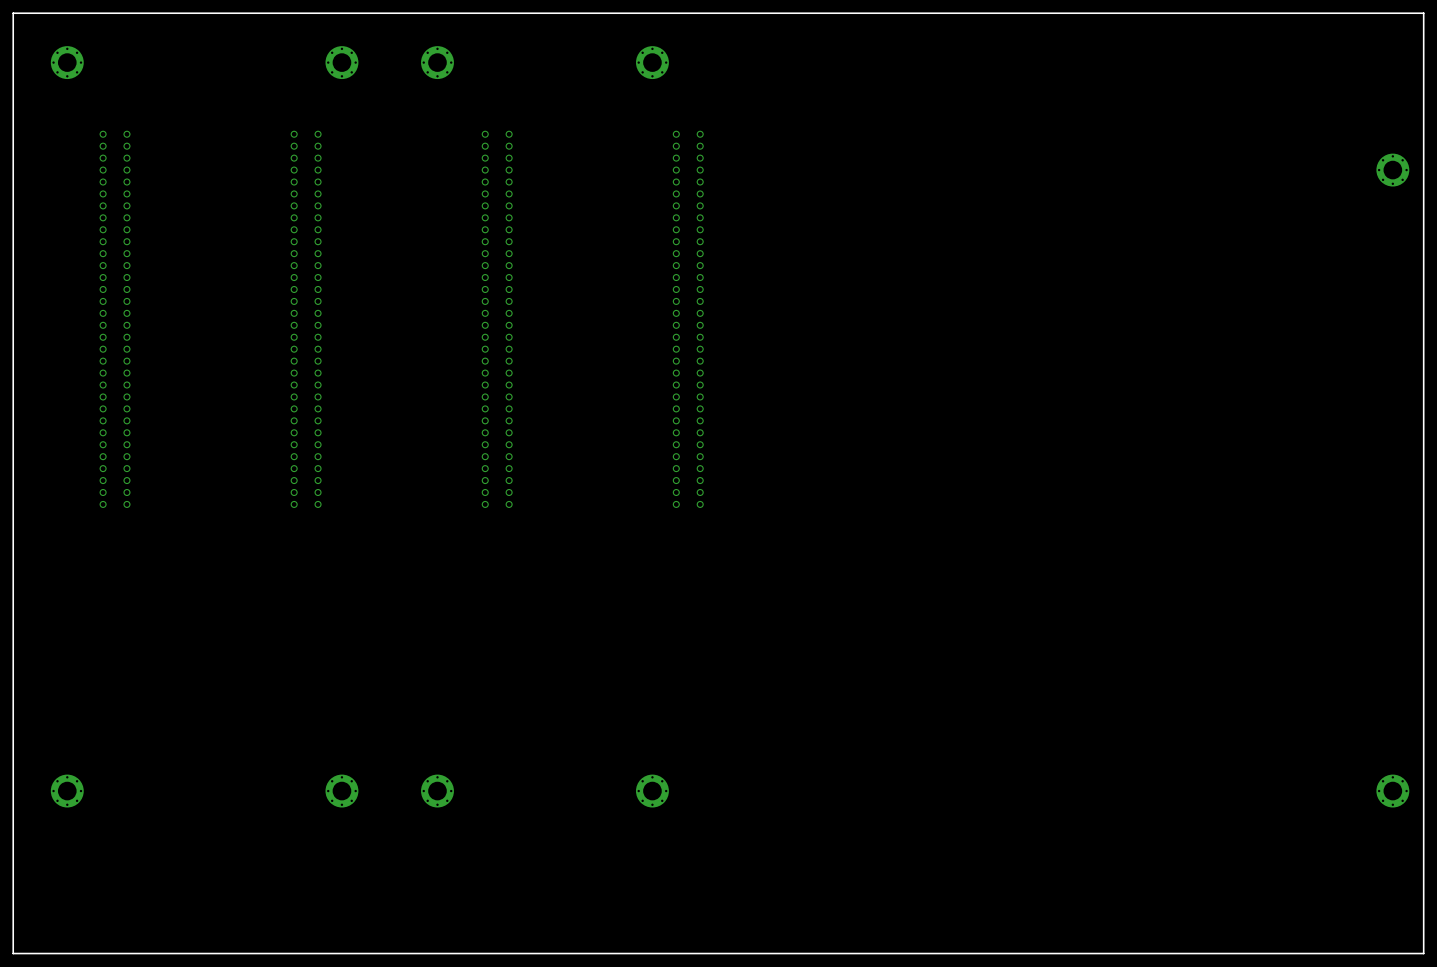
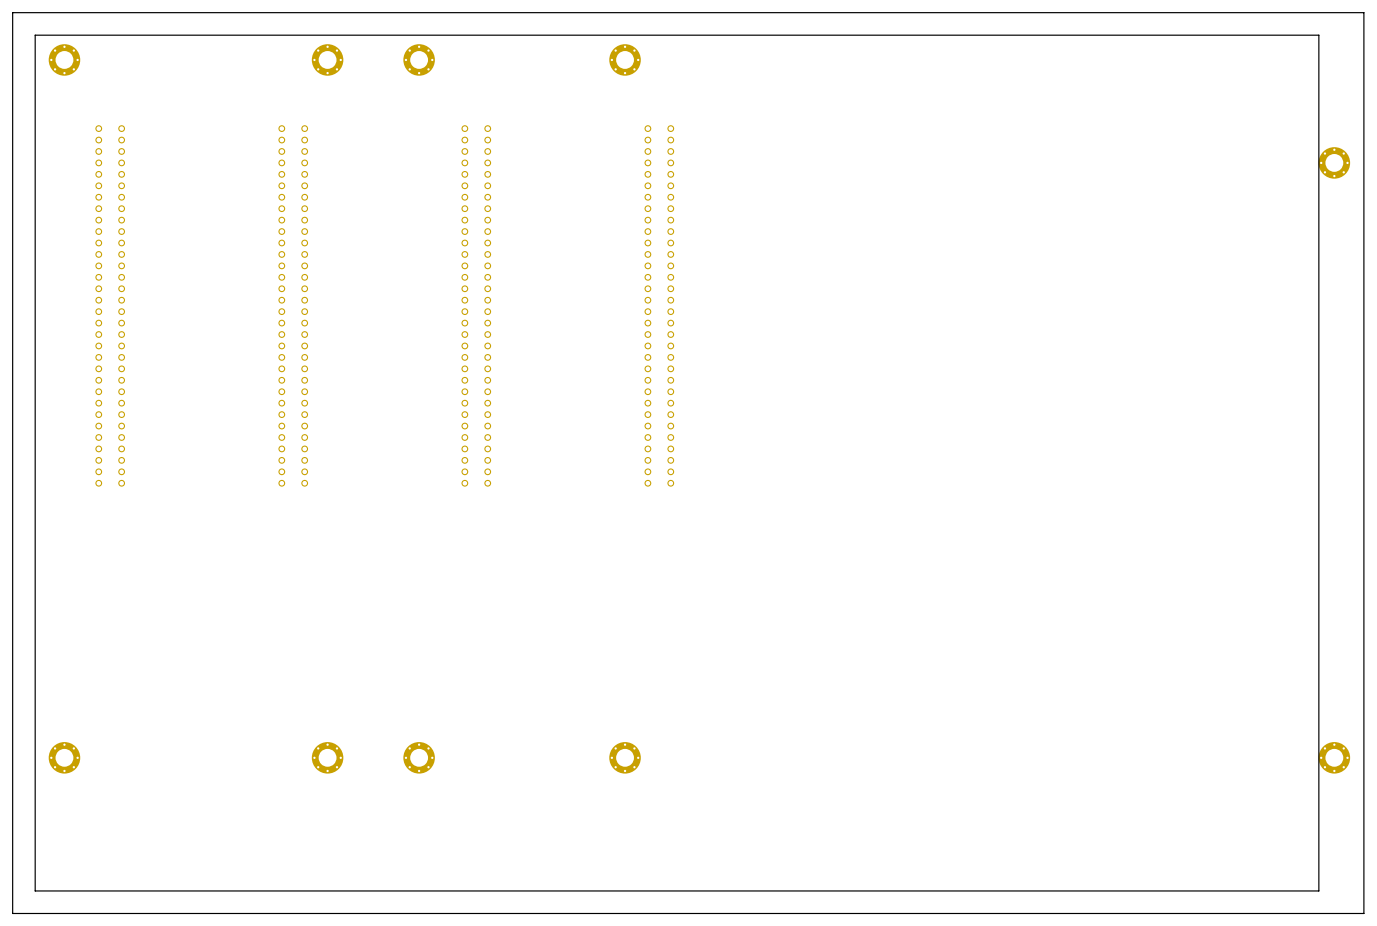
line: none -> (35, 35) (1318, 35) (1318, 890) (35, 890) (35, 35)

